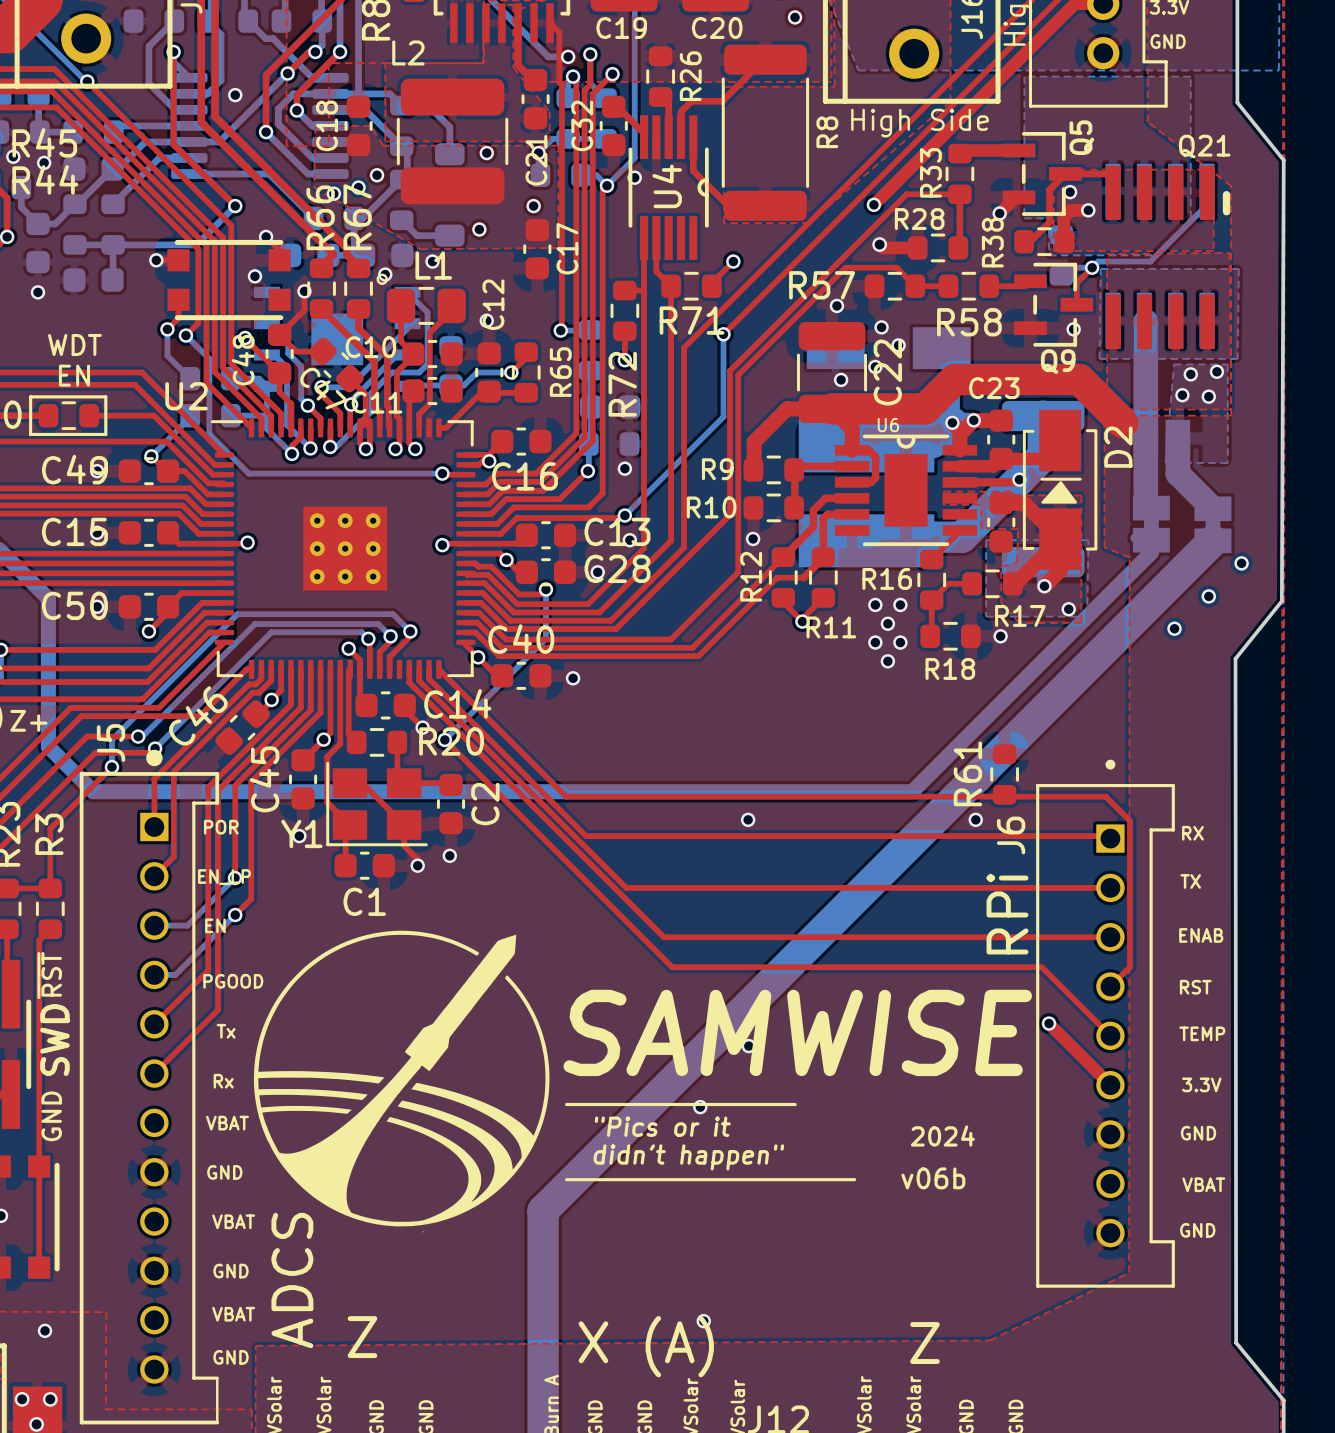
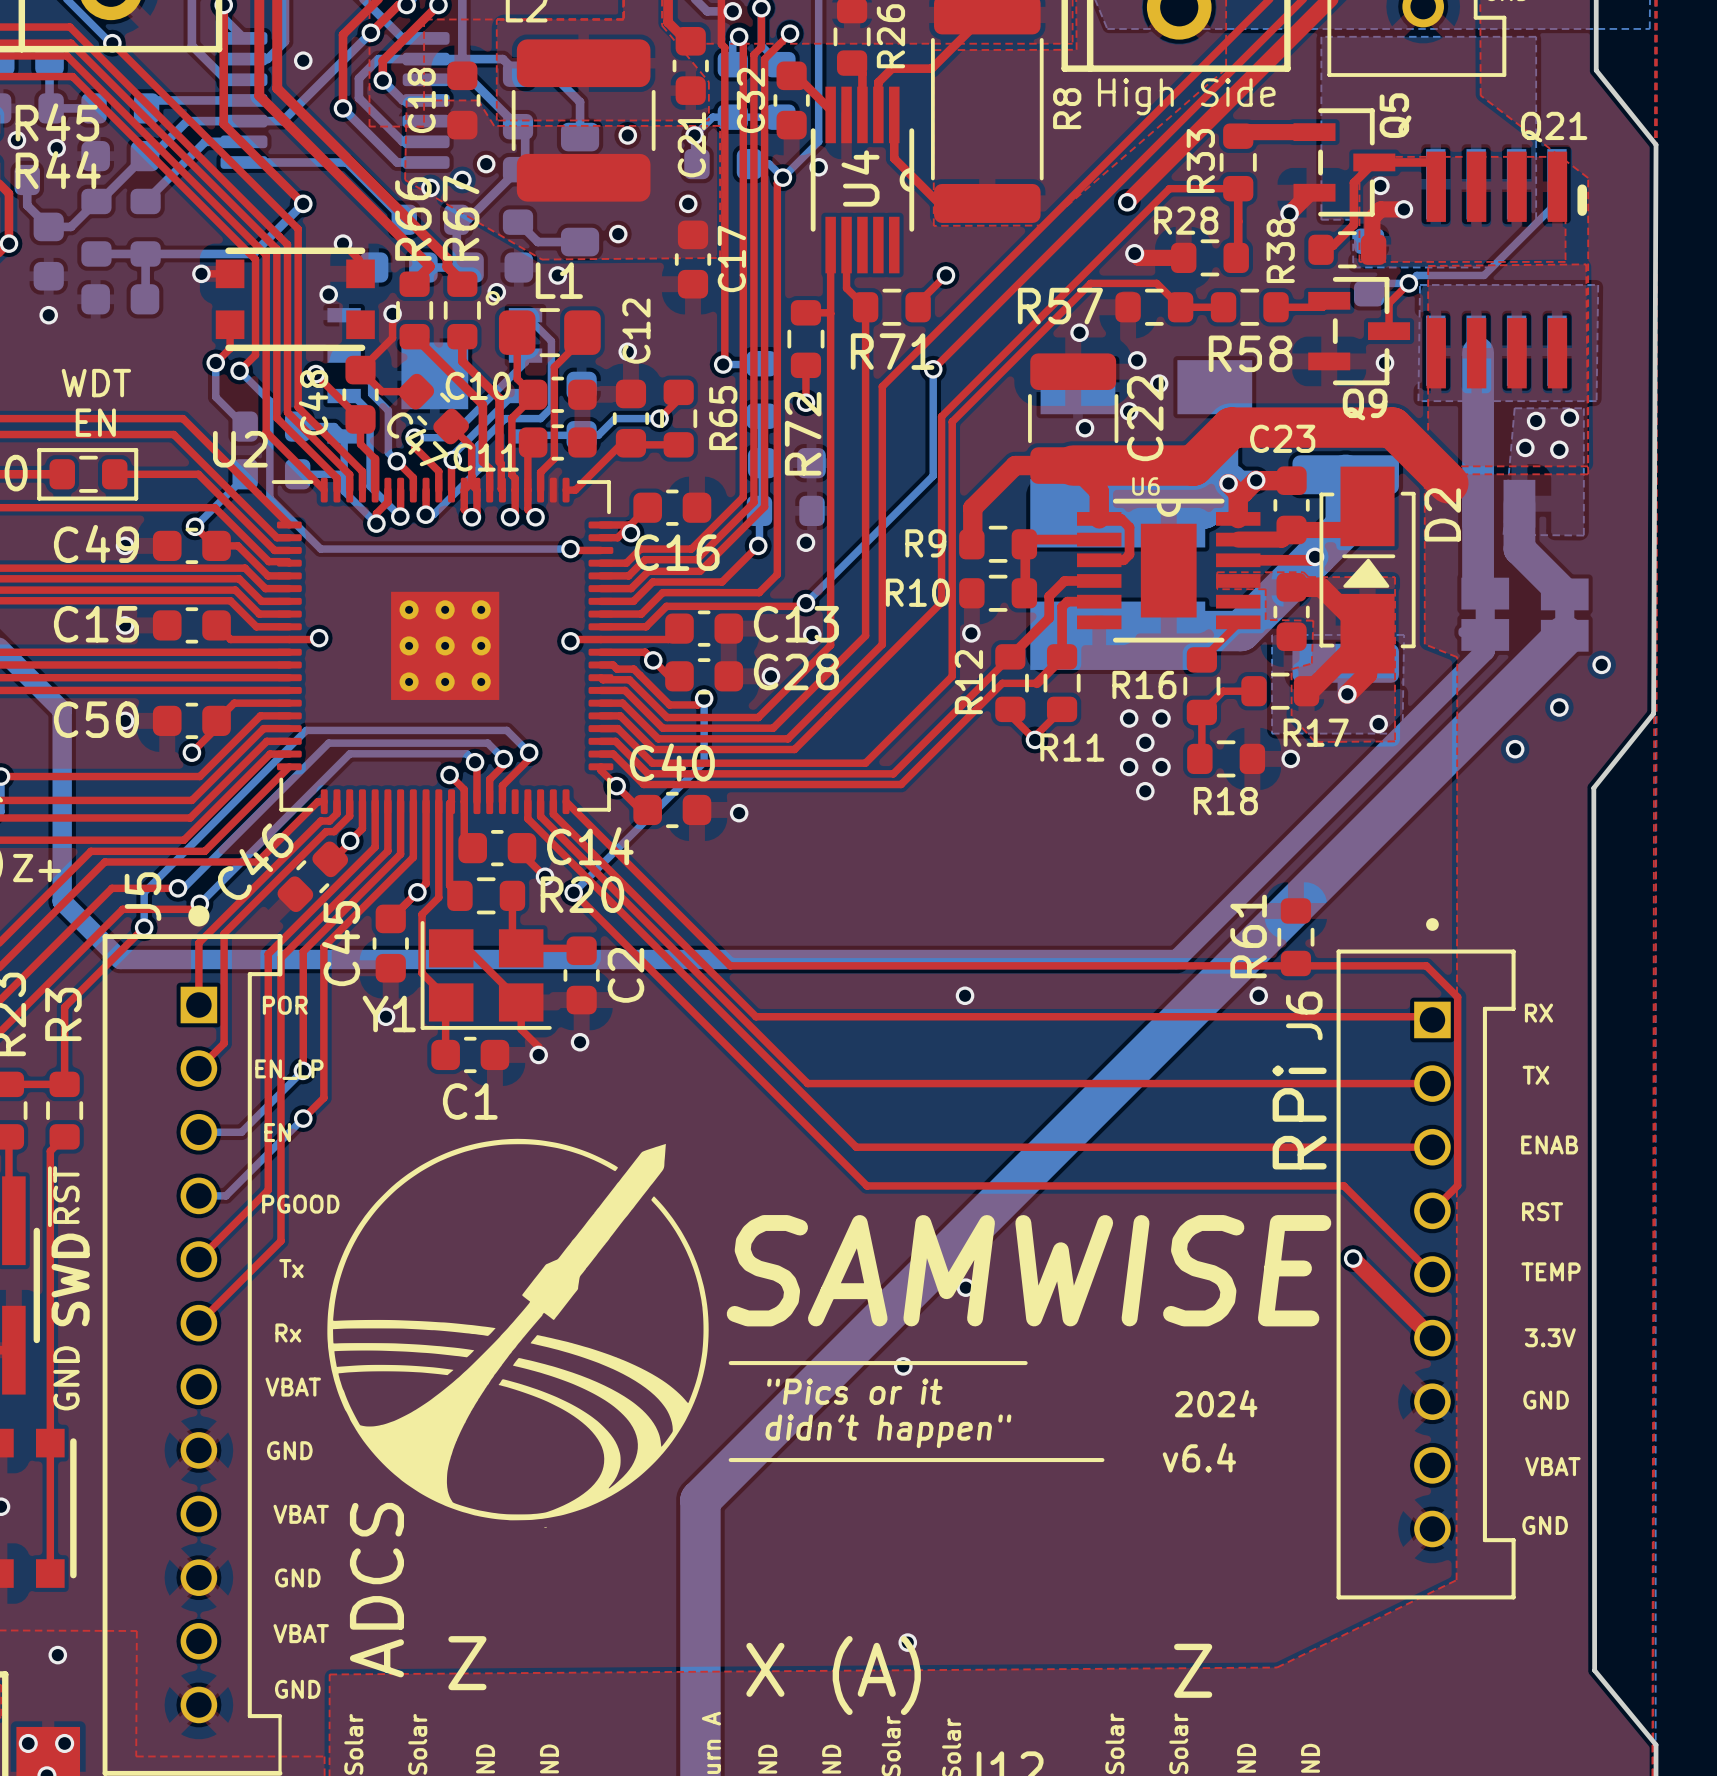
text: v06b (933, 1178) -> v6.4 (1199, 1457)

